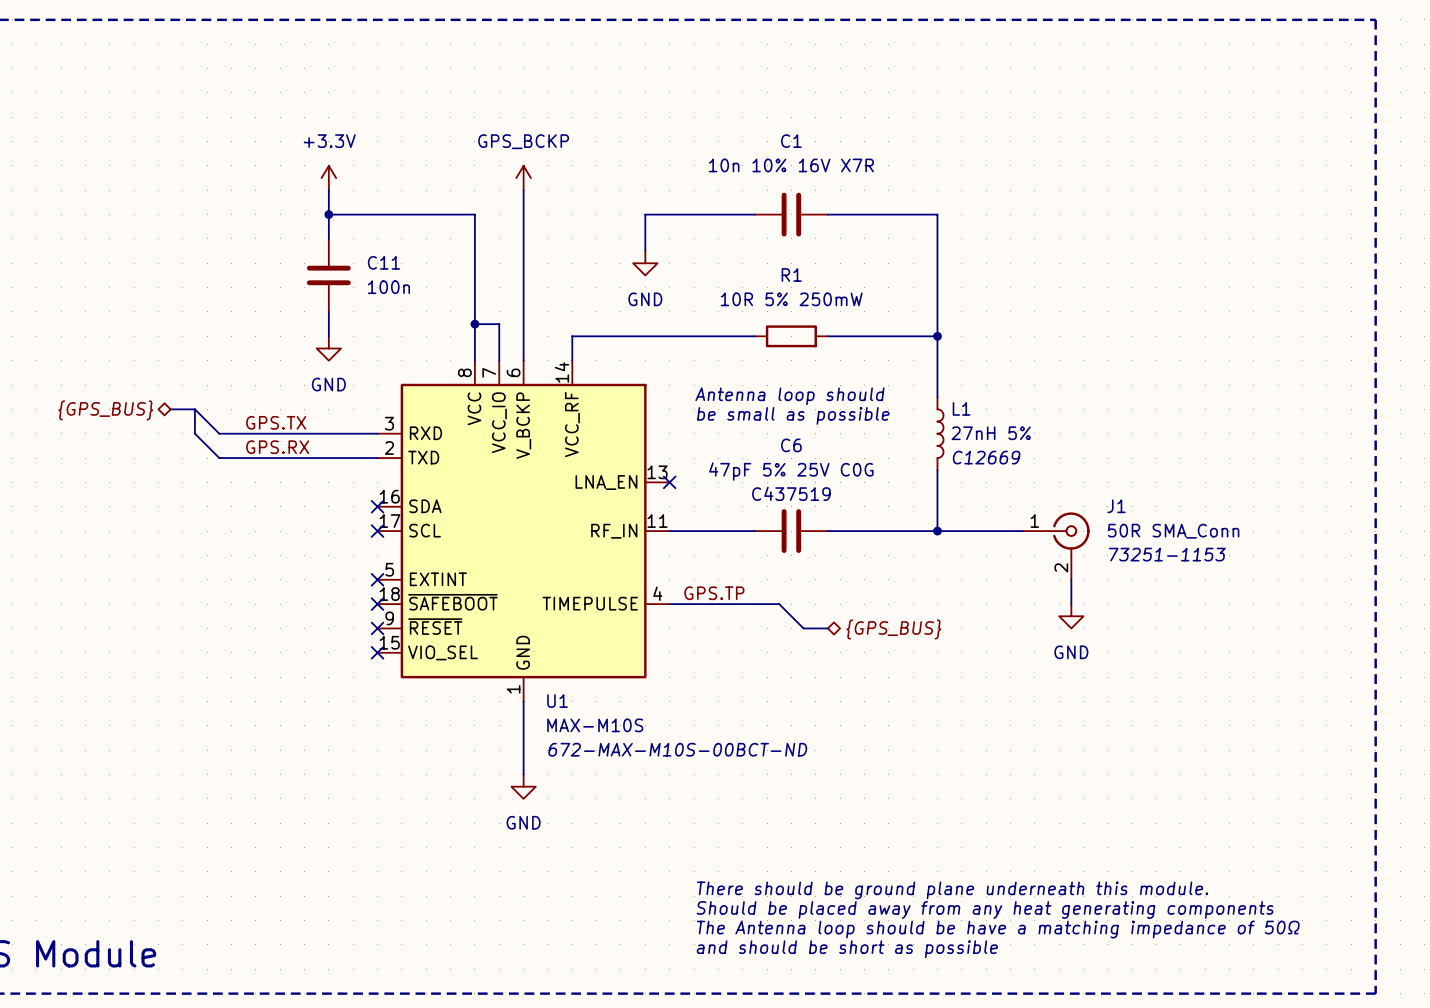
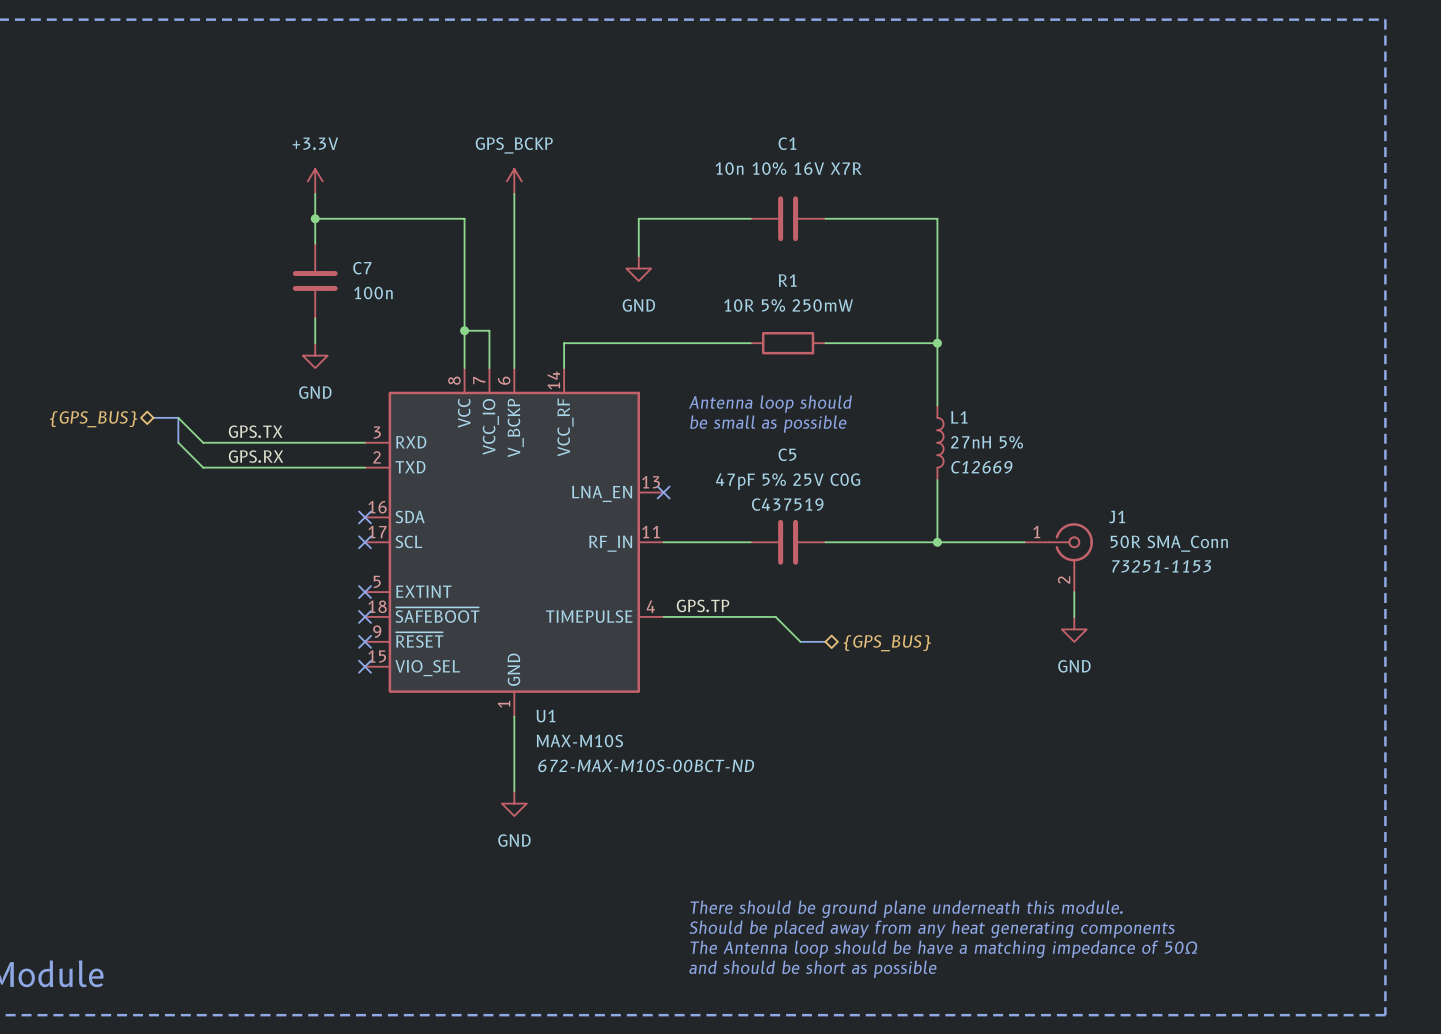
C11 name: C11 (384, 262) -> C7 (362, 268)
C6 name: C6 (791, 445) -> C5 (787, 454)

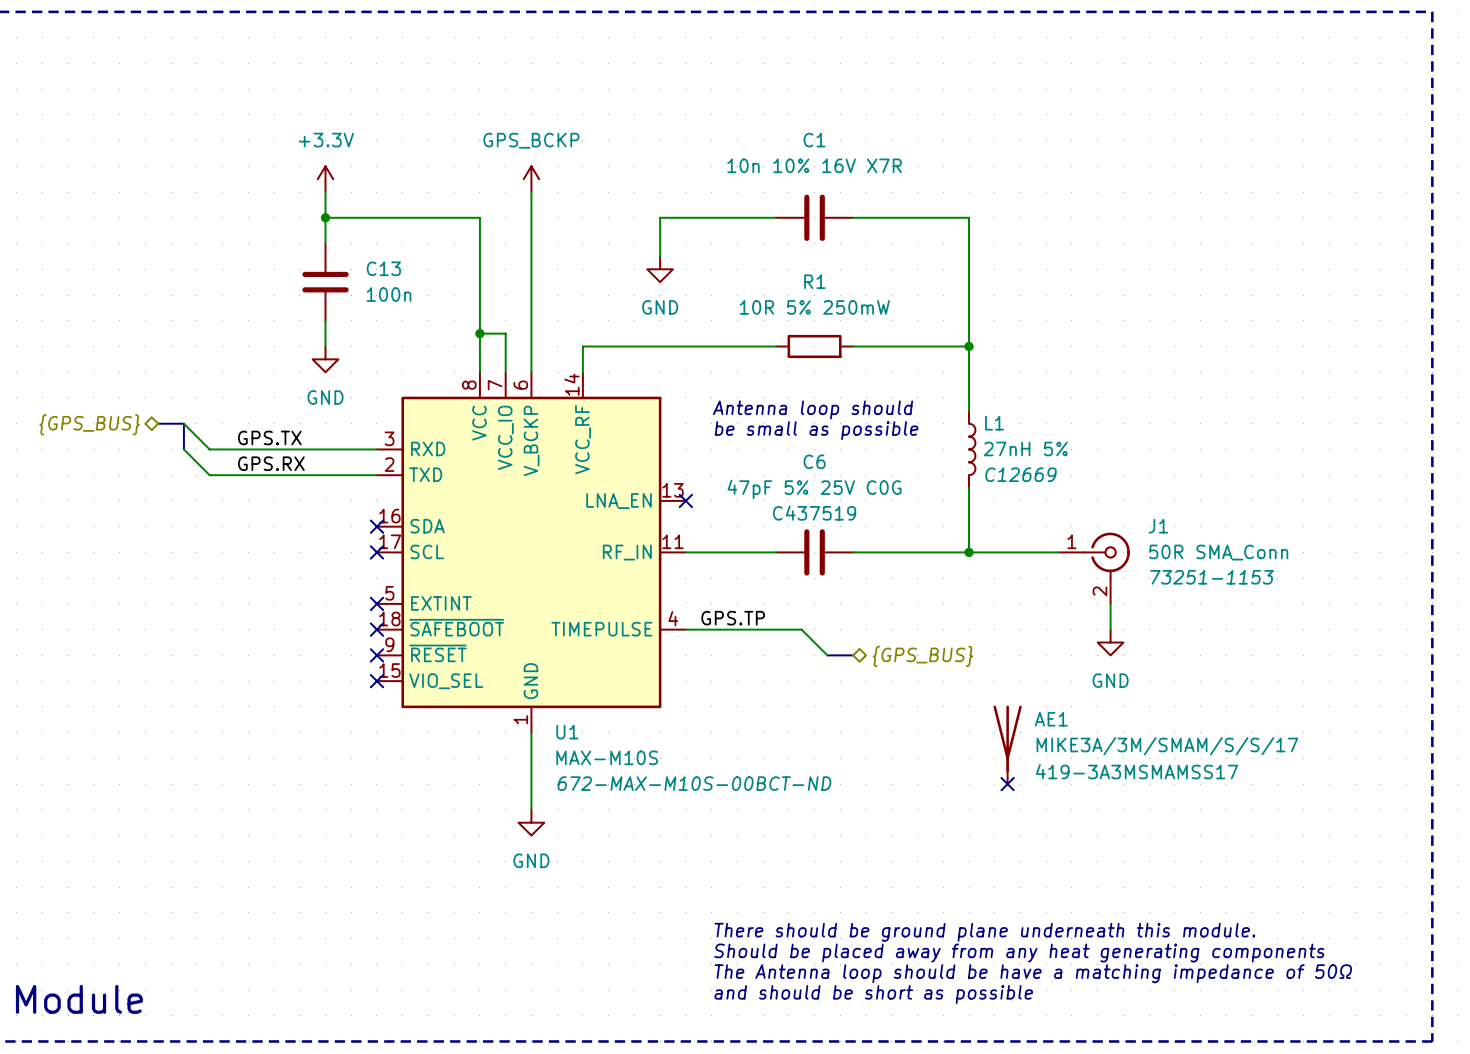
C7 name: C7 (362, 268) -> C13 (383, 268)
C5 name: C5 (787, 454) -> C6 (814, 461)
AE1: none -> MIKE3A/3M/SMAM/S/S/17 (1007, 744)
no-connect mark: none -> (1007, 784)

